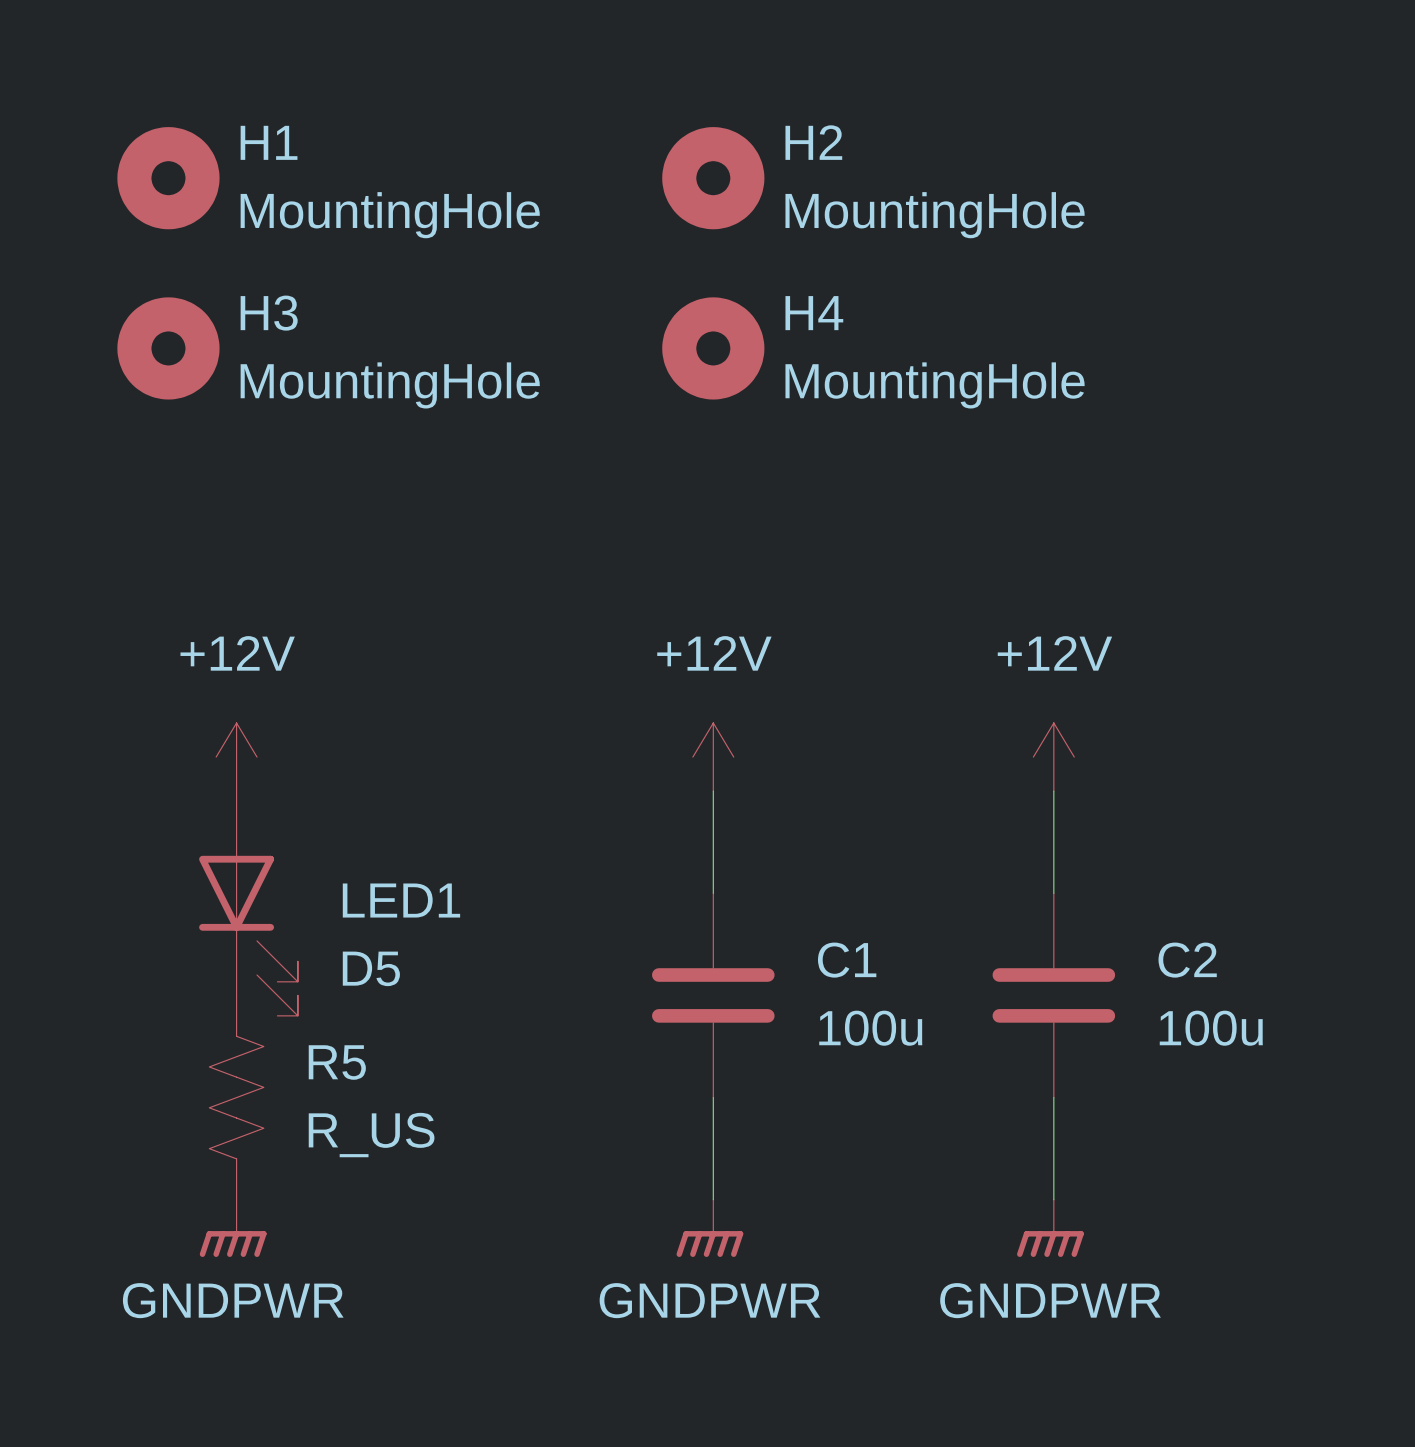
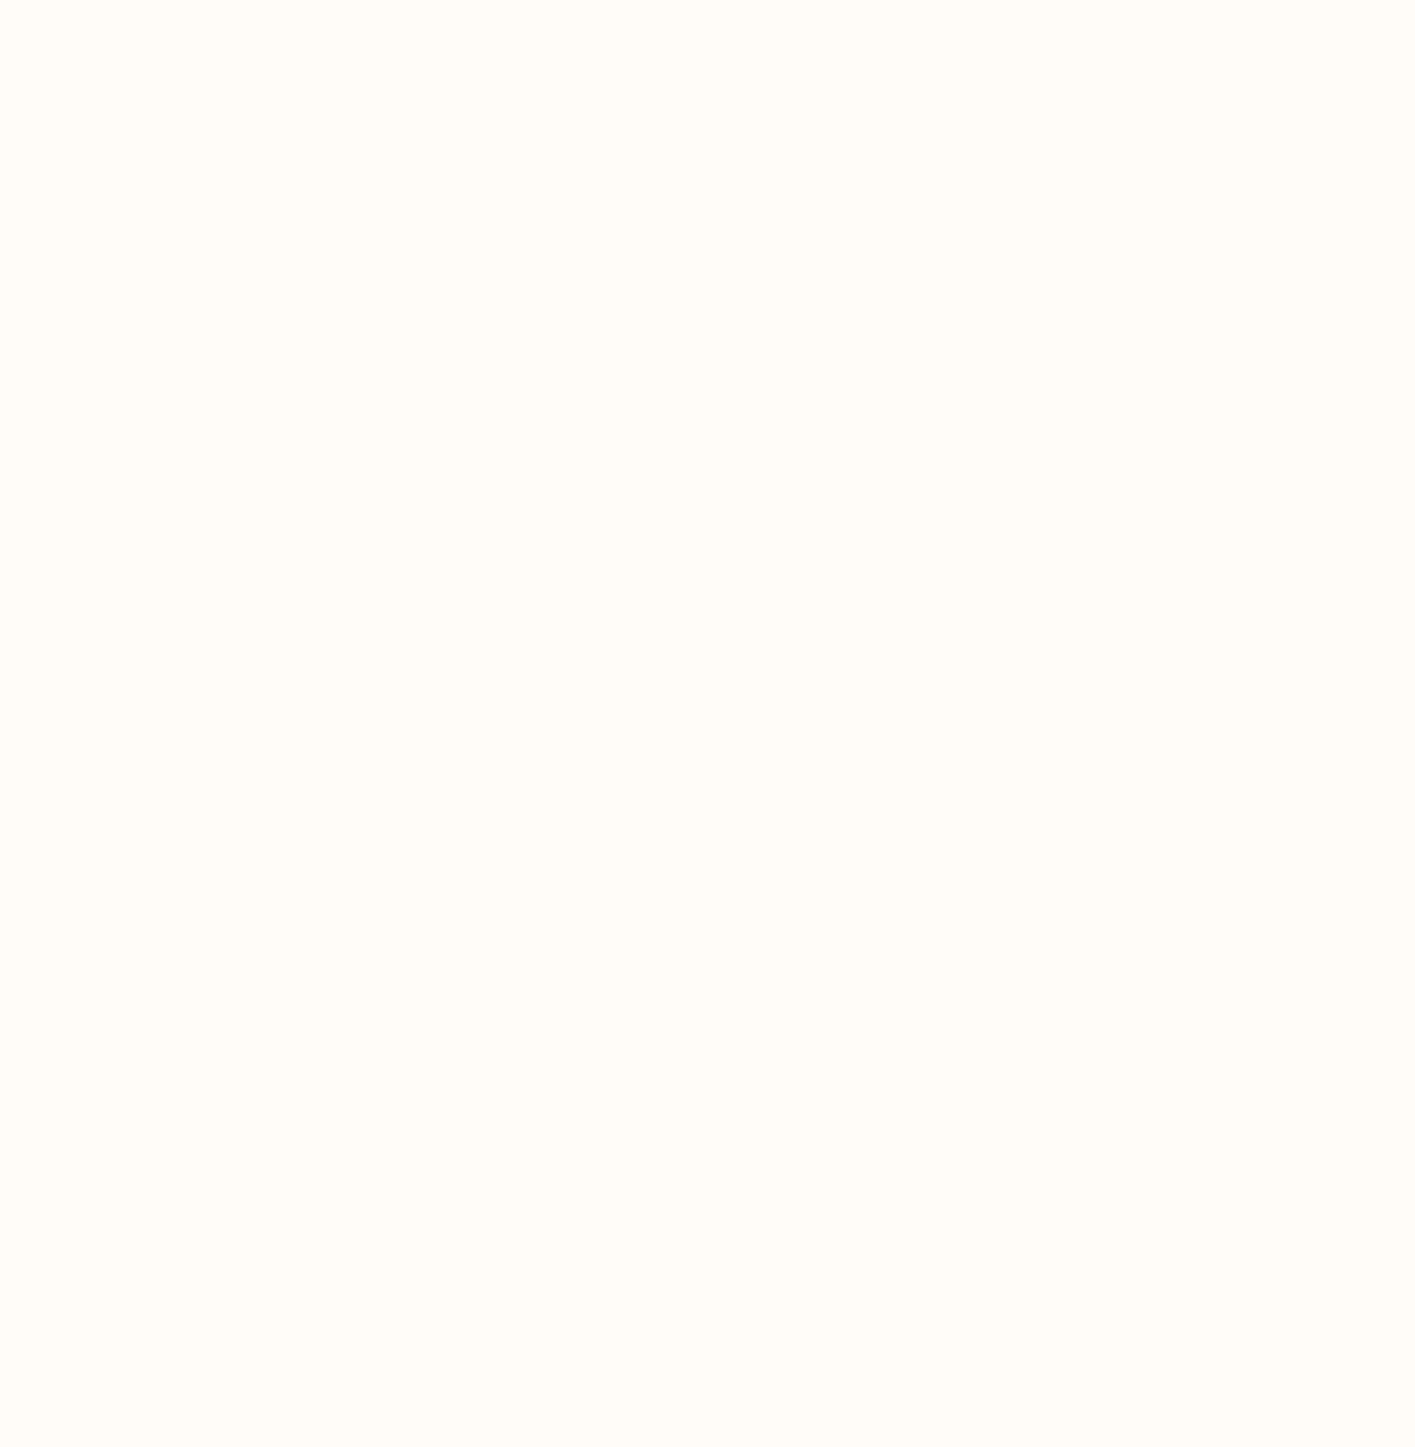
H1: MountingHole (168, 178) -> none
H2: MountingHole (713, 178) -> none
H3: MountingHole (168, 348) -> none
H4: MountingHole (713, 348) -> none
power symbol: +12V (236, 757) -> none
power symbol: +12V (713, 757) -> none
power symbol: +12V (1053, 757) -> none
wire: (713, 791) (713, 893) -> none
wire: (1053, 791) (1053, 893) -> none
LED1: D5 (248, 903) -> none
C1: 100u (713, 995) -> none
C2: 100u (1053, 995) -> none
R5: R_US (236, 1097) -> none
wire: (713, 1097) (713, 1199) -> none
wire: (1053, 1097) (1053, 1199) -> none
power symbol: GNDPWR (233, 1228) -> none
power symbol: GNDPWR (709, 1228) -> none
power symbol: GNDPWR (1050, 1228) -> none

